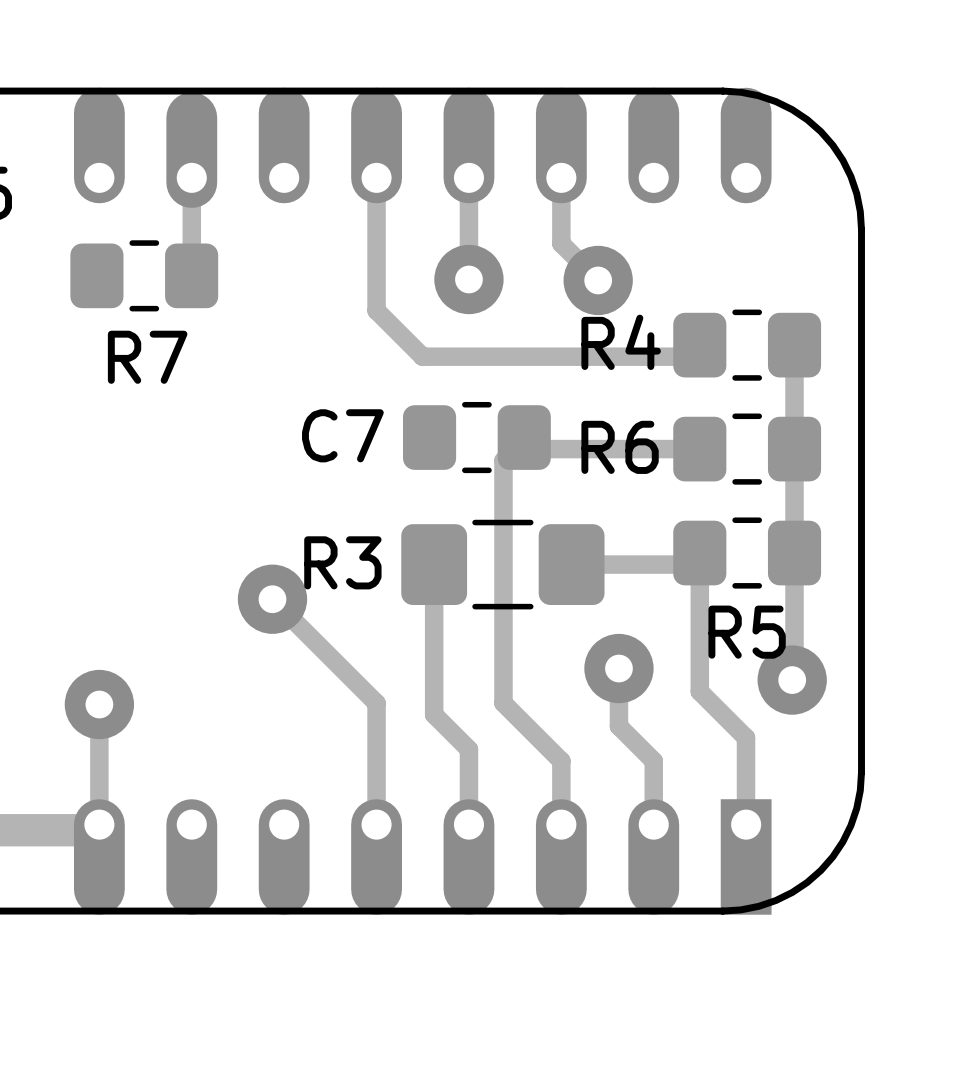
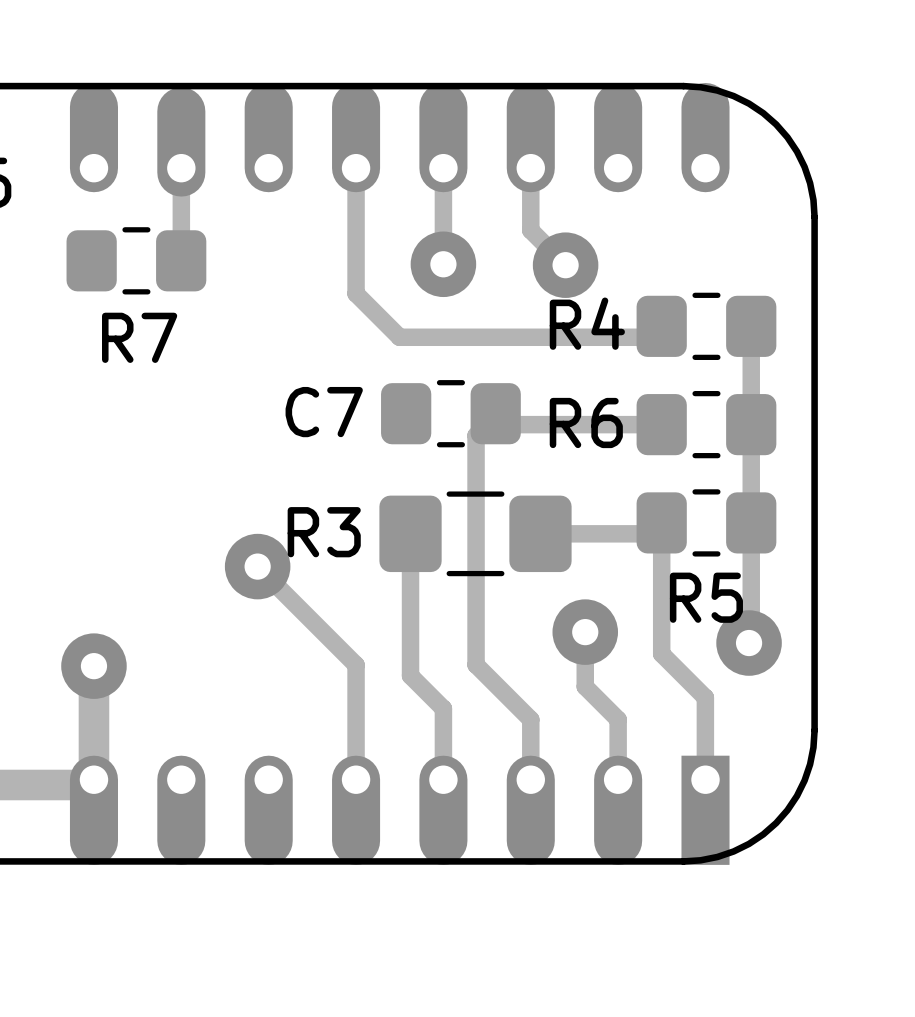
track width: thin (99, 704) (99, 824) -> thick (93, 666) (93, 779)

